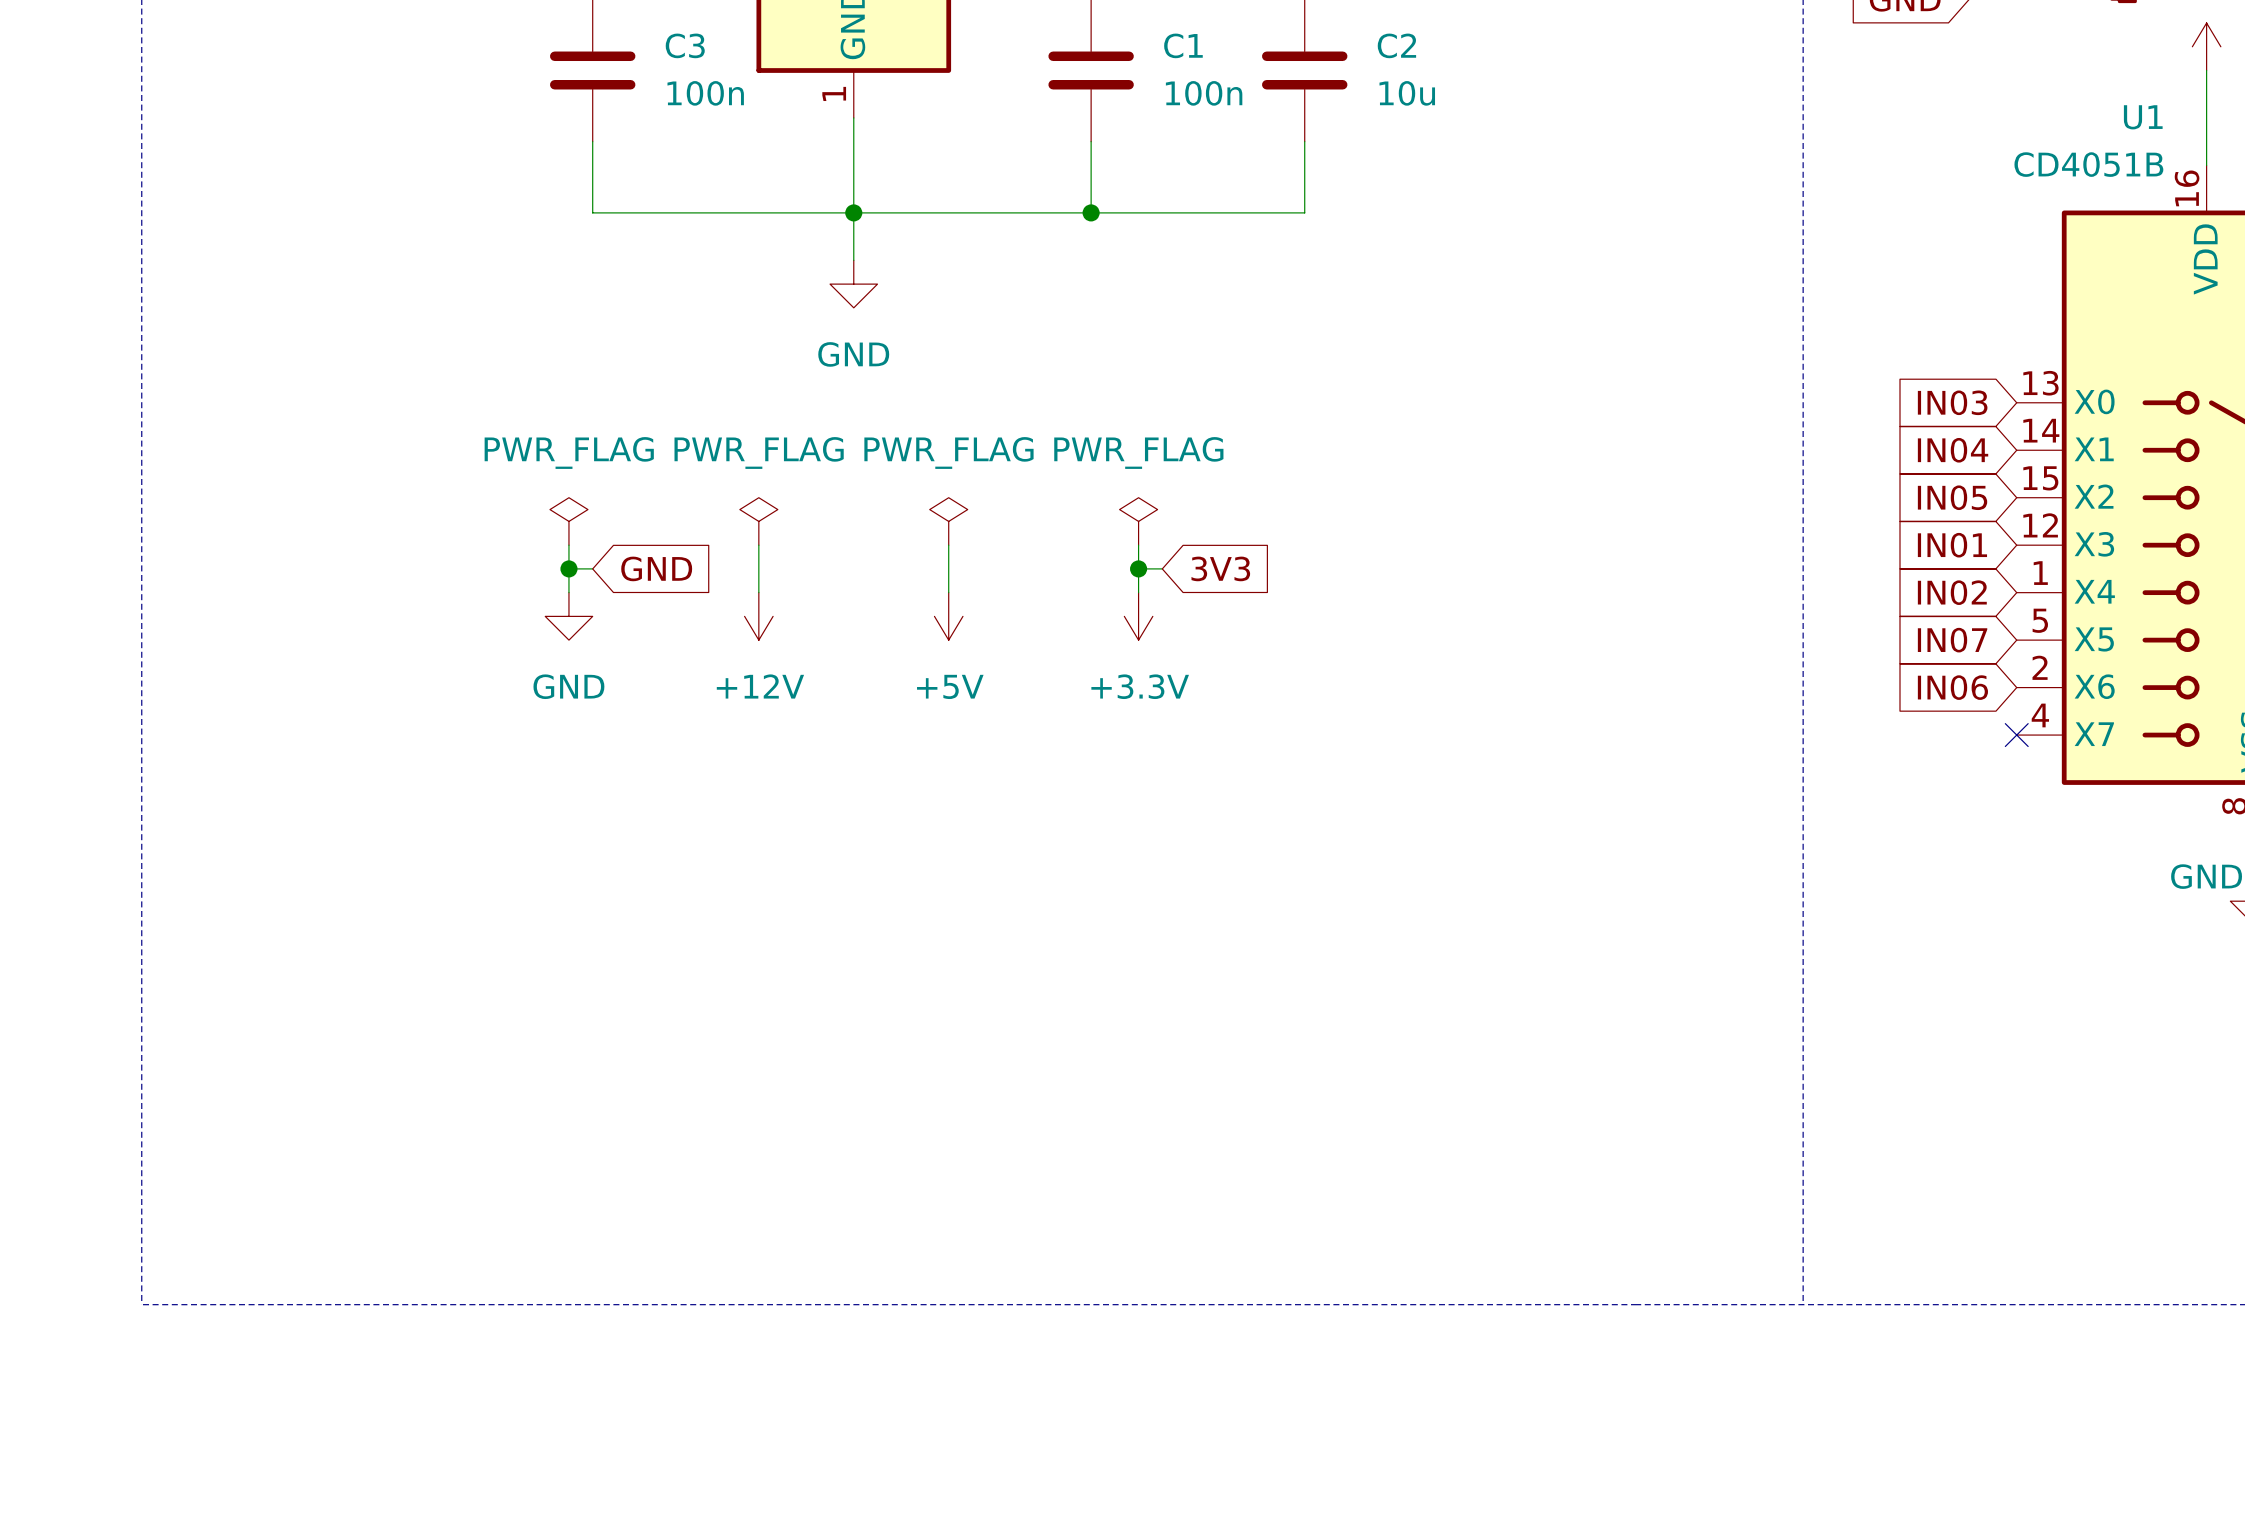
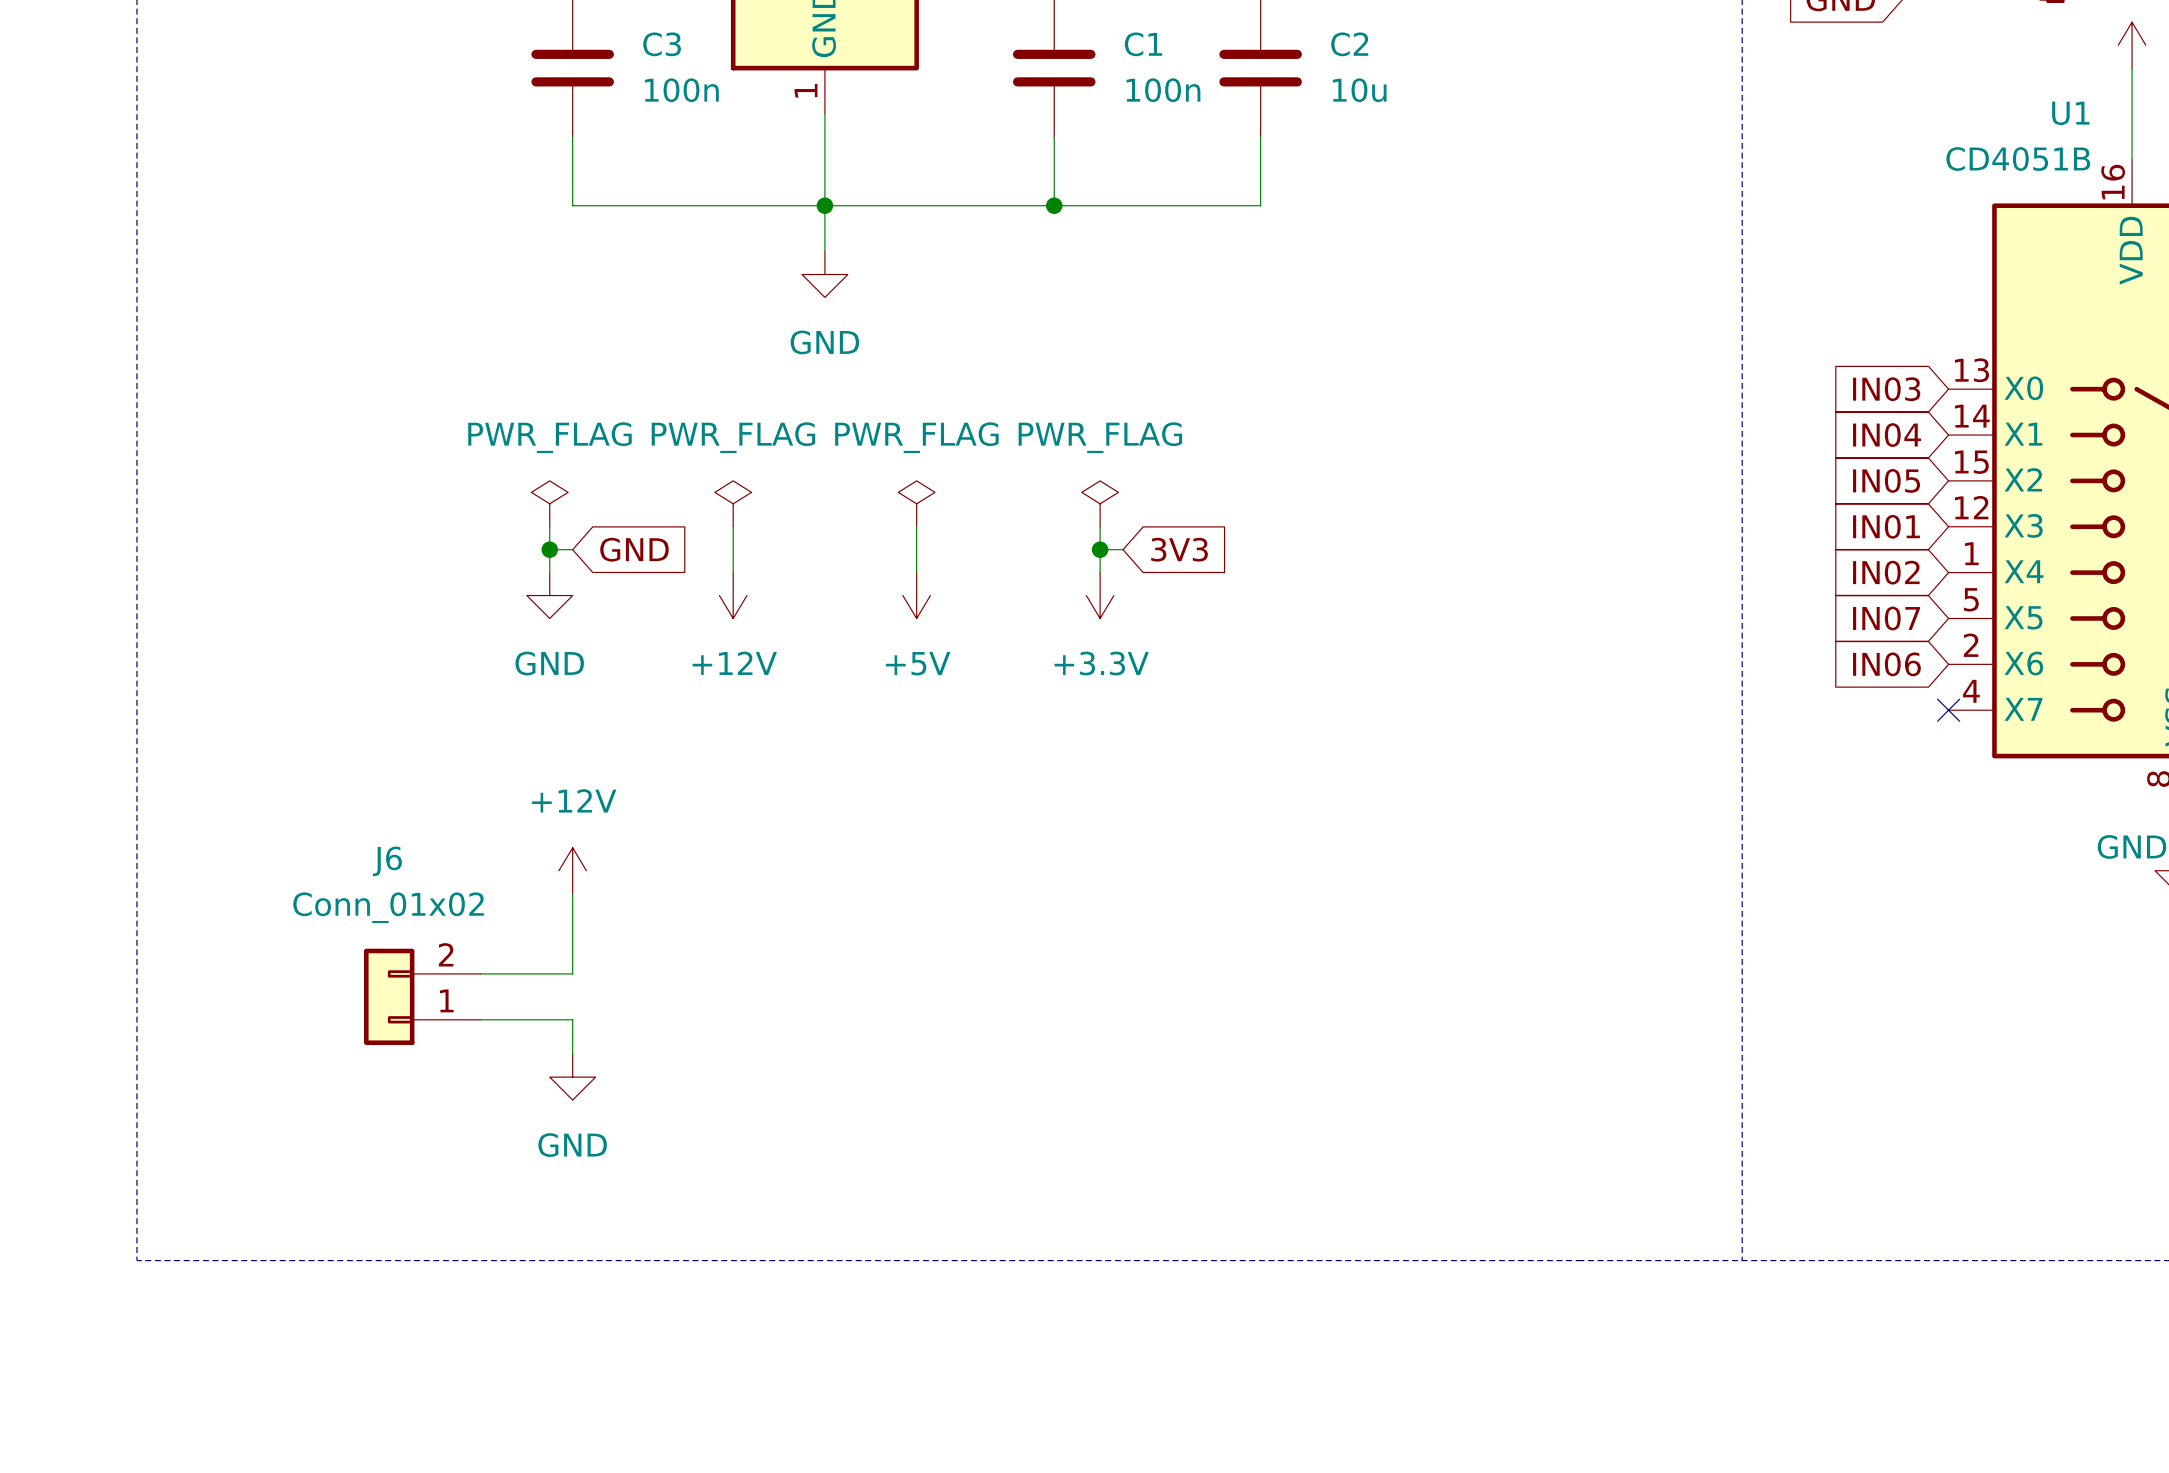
power symbol: none -> +12V (572, 870)
wire: none -> (572, 893) (572, 973) (480, 973)
J6: none -> Conn_01x02 (422, 996)
wire: none -> (480, 1019) (572, 1019) (572, 1054)
power symbol: none -> GND (572, 1077)

